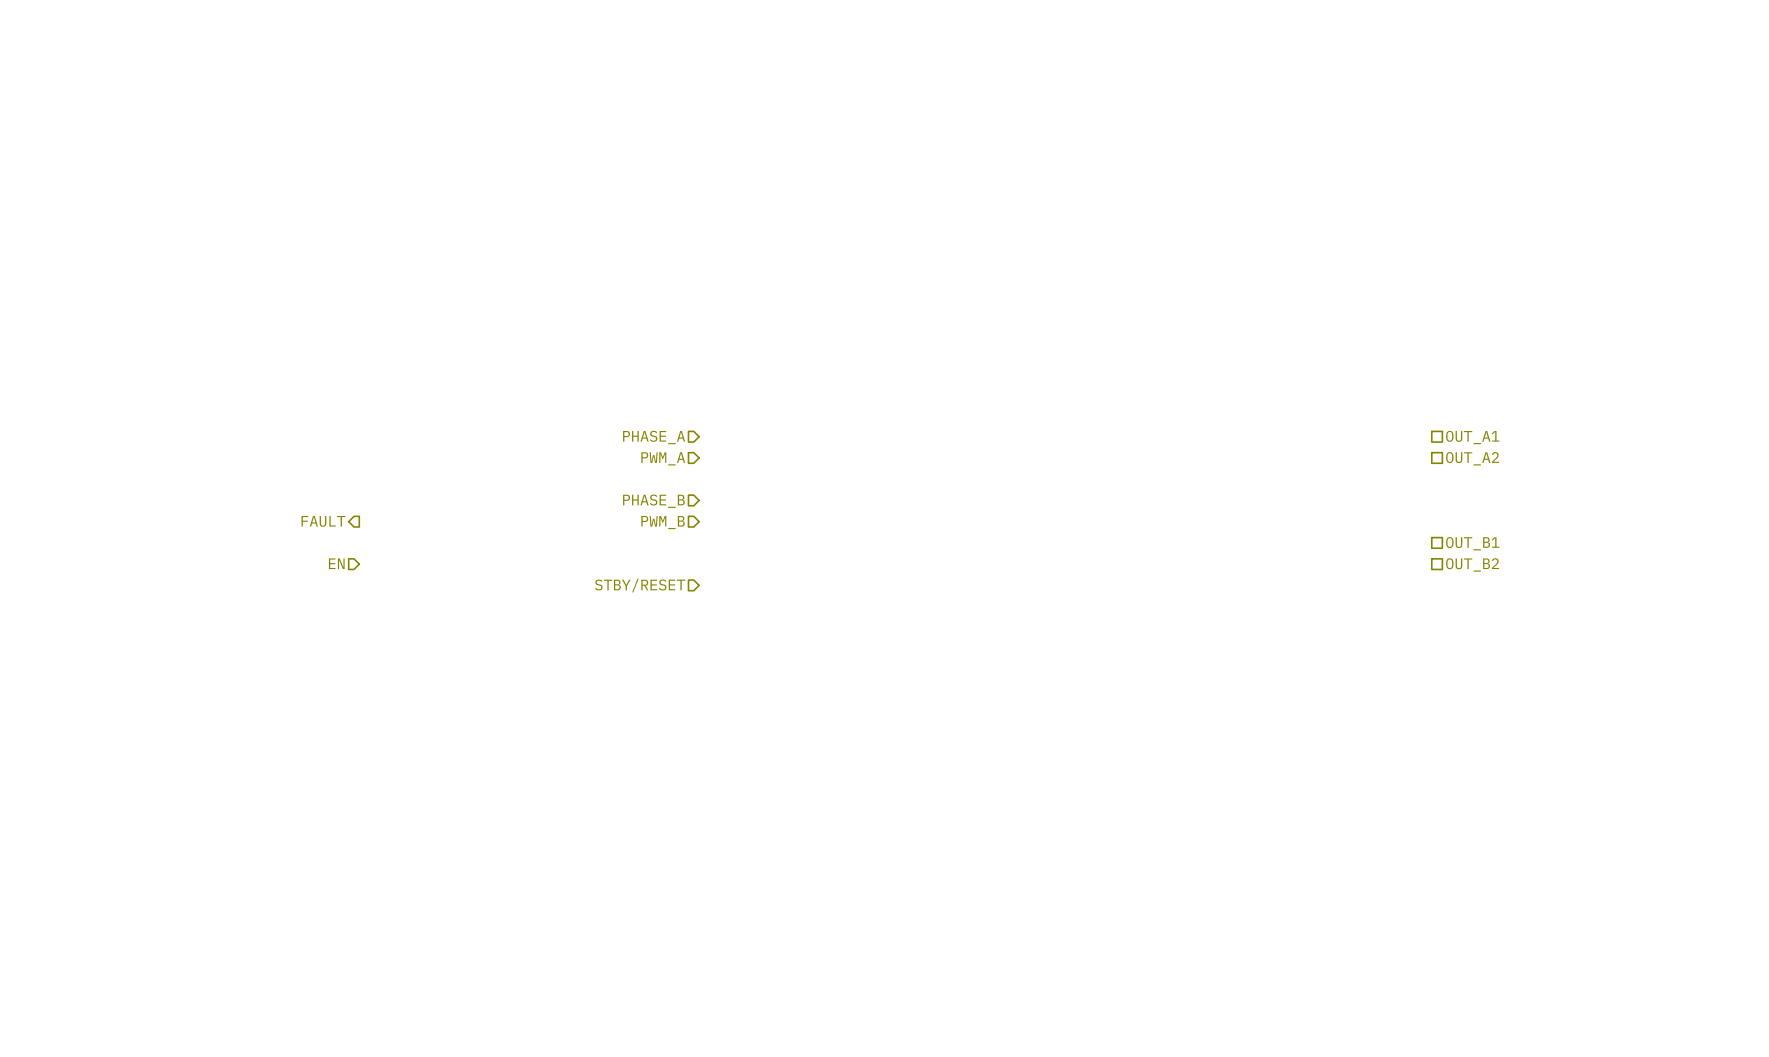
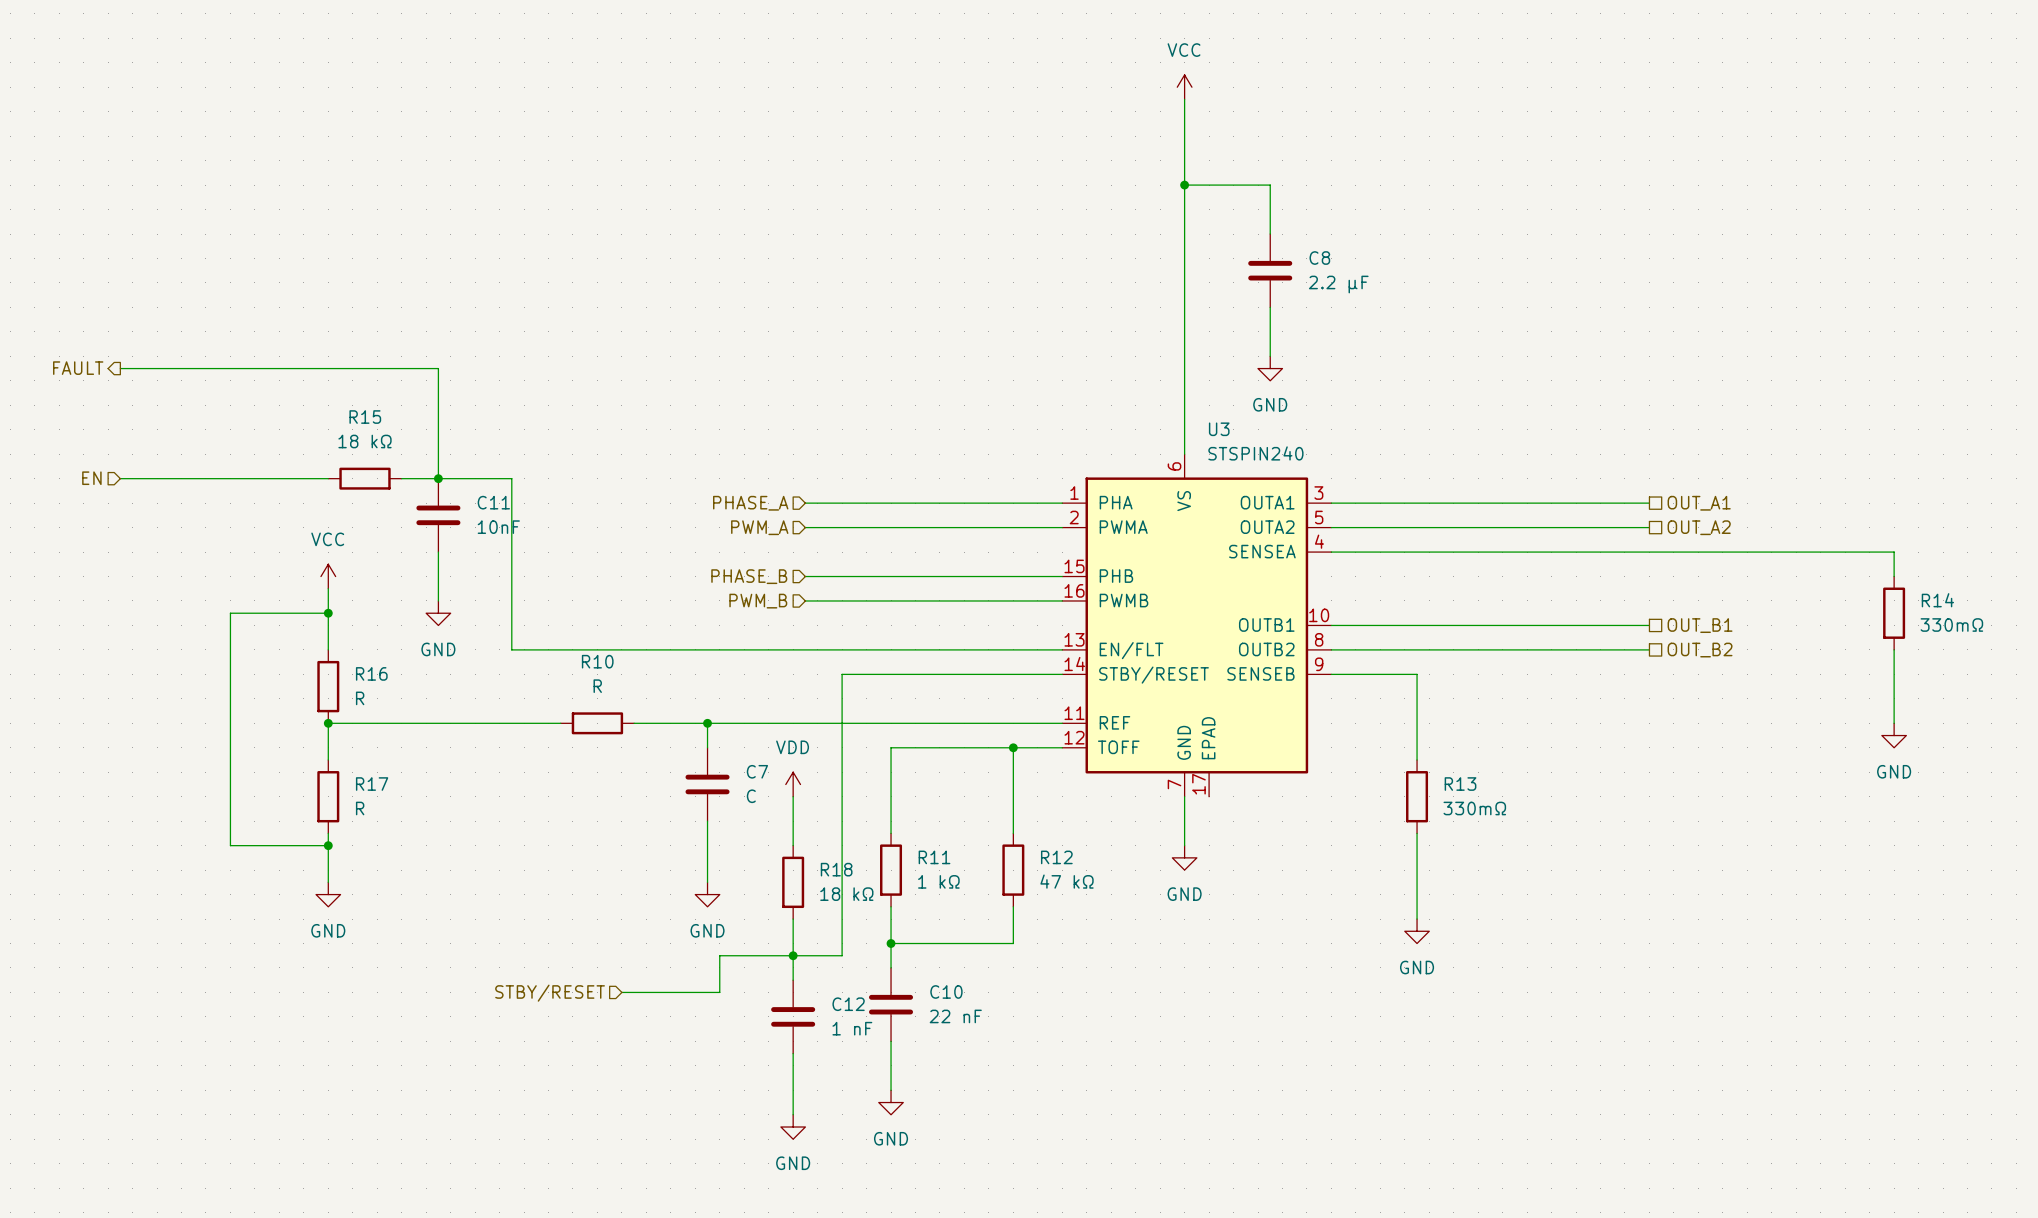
power symbol: none -> VCC (1184, 87)
wire: none -> (1184, 99) (1184, 454)
wire: none -> (1184, 185) (1270, 185) (1270, 234)
junction: none -> (1184, 185)
C8: none -> 2.2 µF (1270, 270)
wire: none -> (1270, 307) (1270, 356)
hierarchical label: none -> FAULT (78, 368)
wire: none -> (120, 368) (438, 368) (438, 478)
power symbol: none -> GND (1270, 368)
hierarchical label: none -> EN (91, 478)
wire: none -> (120, 478) (328, 478)
R15: none -> 18 kΩ (365, 478)
wire: none -> (401, 478) (511, 478) (511, 649) (1062, 649)
junction: none -> (438, 478)
wire: none -> (805, 503) (1062, 503)
wire: none -> (1331, 503) (1649, 503)
C11: none -> 10nF (438, 515)
wire: none -> (805, 527) (1062, 527)
wire: none -> (1331, 527) (1649, 527)
wire: none -> (438, 552) (438, 600)
wire: none -> (1331, 552) (1894, 552) (1894, 576)
power symbol: none -> VCC (328, 576)
wire: none -> (805, 576) (1062, 576)
wire: none -> (328, 588) (328, 649)
hierarchical label: FAULT (323, 521) -> none
wire: none -> (805, 600) (1062, 600)
wire: none -> (328, 613) (230, 613) (230, 845) (328, 845)
junction: none -> (328, 613)
power symbol: none -> GND (438, 613)
R14: none -> 330mΩ (1894, 613)
U3: none -> STSPIN240 (1196, 625)
wire: none -> (1331, 625) (1649, 625)
hierarchical label: EN (336, 563) -> none
wire: none -> (1331, 649) (1649, 649)
wire: none -> (1894, 649) (1894, 723)
hierarchical label: STBY/RESET (640, 585) -> none
wire: none -> (1062, 674) (842, 674) (842, 955) (719, 955) (719, 992) (621, 992)
wire: none -> (1331, 674) (1417, 674) (1417, 760)
R16: none -> R (328, 686)
junction: none -> (328, 723)
wire: none -> (560, 723) (328, 723) (328, 760)
R10: none -> R (597, 723)
wire: none -> (634, 723) (1062, 723)
wire: none -> (707, 723) (707, 747)
junction: none -> (707, 723)
power symbol: none -> GND (1894, 735)
wire: none -> (1013, 747) (1013, 833)
junction: none -> (1013, 747)
wire: none -> (1062, 747) (891, 747) (891, 833)
C7: none -> C (707, 784)
power symbol: none -> VDD (793, 784)
R17: none -> R (328, 796)
wire: none -> (793, 796) (793, 845)
wire: none -> (1184, 796) (1184, 845)
R13: none -> 330mΩ (1417, 796)
wire: none -> (707, 821) (707, 882)
wire: none -> (328, 833) (328, 882)
wire: none -> (1417, 833) (1417, 919)
junction: none -> (328, 845)
power symbol: none -> GND (1184, 857)
R11: none -> 1 kΩ (891, 870)
R12: none -> 47 kΩ (1013, 870)
R18: none -> 18 kΩ (793, 882)
power symbol: none -> GND (328, 894)
power symbol: none -> GND (707, 894)
wire: none -> (891, 906) (891, 967)
wire: none -> (1013, 906) (1013, 943) (891, 943)
wire: none -> (793, 919) (793, 980)
power symbol: none -> GND (1417, 931)
junction: none -> (891, 943)
junction: none -> (793, 955)
hierarchical label: none -> STBY/RESET (550, 993)
C10: none -> 22 nF (891, 1004)
C12: none -> 1 nF (793, 1016)
wire: none -> (891, 1041) (891, 1090)
wire: none -> (793, 1053) (793, 1114)
power symbol: none -> GND (891, 1102)
power symbol: none -> GND (793, 1127)

